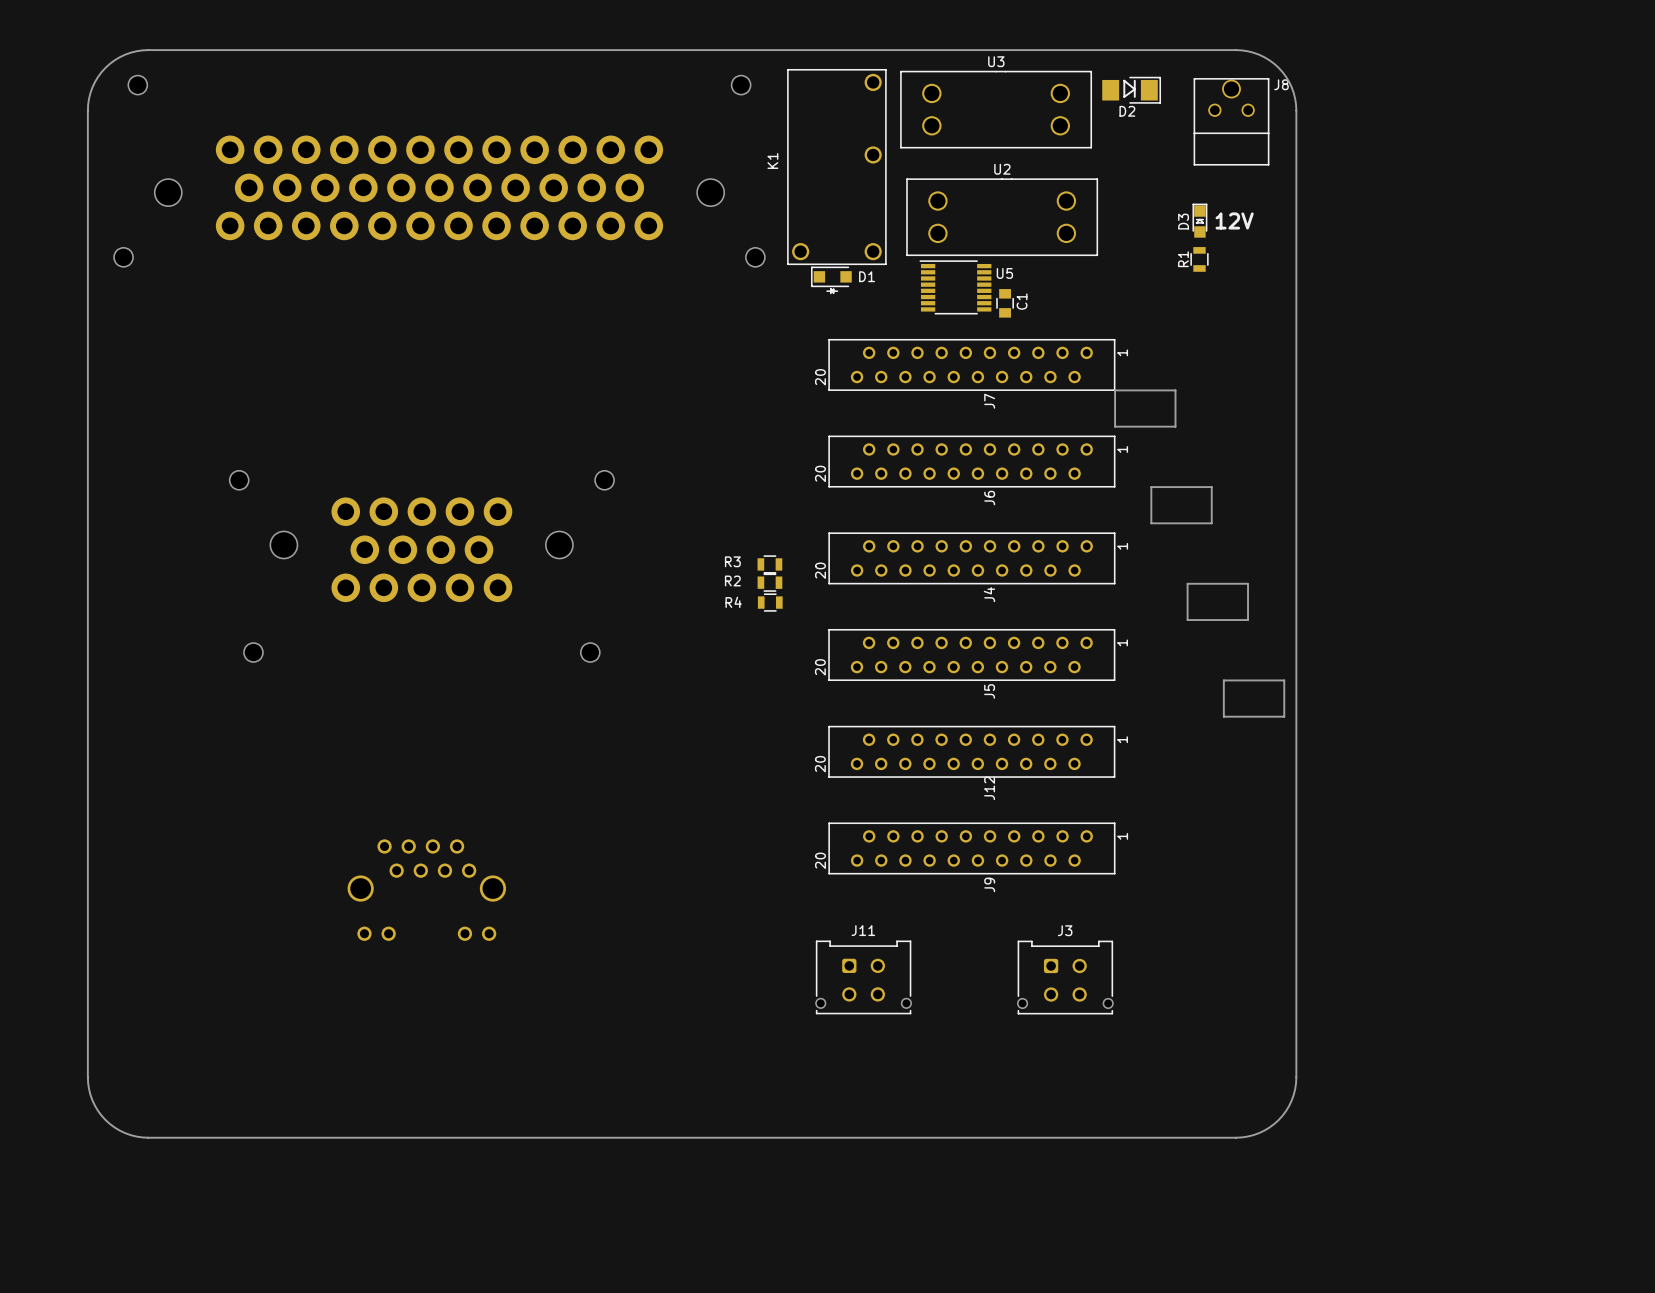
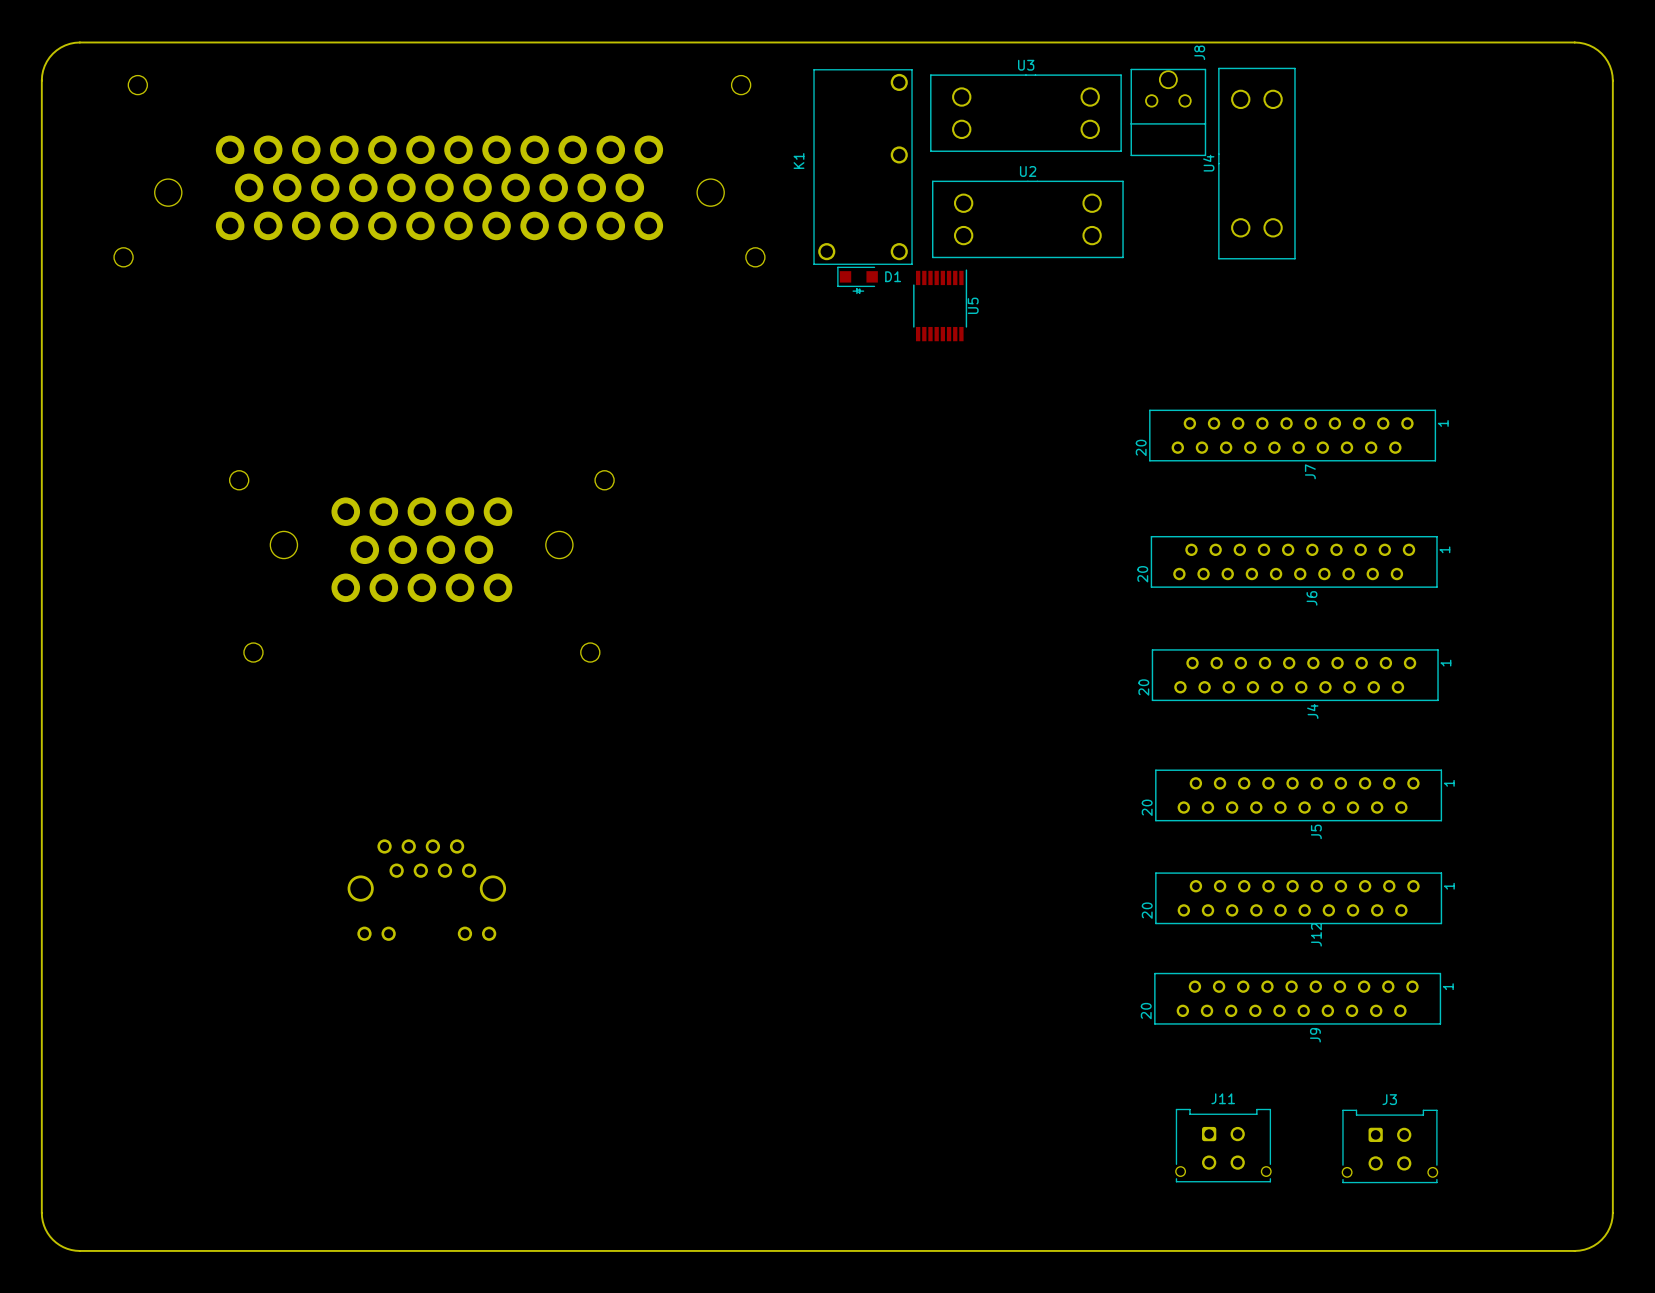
board edge: (148, 50) (1235, 50) (1259, 54) (1278, 67) (1291, 87) (1296, 110) (1296, 1077) (1291, 1100) (1278, 1120) (1259, 1133) (1235, 1137) (148, 1137) (125, 1133) (105, 1120) (92, 1100) (87, 1077) (87, 110) (92, 87) (105, 67) (125, 54) (148, 50) -> (79, 42) (65, 45) (52, 53) (44, 65) (41, 80) (41, 1212) (45, 1229) (56, 1242) (67, 1248) (79, 1250) (1574, 1250) (1593, 1245) (1604, 1236) (1609, 1227) (1612, 1212) (1612, 80) (1607, 61) (1597, 50) (1589, 45) (1574, 42) (79, 42)
J8 name rotation: 0° (1281, 84) -> 90° counterclockwise (1199, 52)
J8 name position: J8 (1281, 84) -> J8 (1199, 52)
D2: (1131, 90) -> none
U3 position: (996, 109) -> (1025, 113)
J8 position: (1231, 121) -> (1168, 112)
U4: none -> (1256, 163)
K1 position: (836, 167) -> (863, 167)
U2 position: (1002, 217) -> (1027, 219)
D3: (1199, 220) -> none
text: 12V (1234, 220) -> none
R1: (1199, 259) -> none
U5 name position: U5 (1004, 273) -> U5 (973, 305)
D1 position: (831, 280) -> (857, 280)
U5 rotation: 0° (955, 287) -> 90° clockwise (940, 305)
C1: (1005, 303) -> none
J7 position: (971, 364) -> (1292, 435)
board edge: (1115, 390) (1175, 390) (1175, 426) (1115, 426) (1115, 390) -> none
J6 position: (971, 461) -> (1294, 561)
board edge: (1151, 487) (1151, 523) (1211, 523) (1211, 487) (1151, 487) -> none
J4 position: (971, 558) -> (1295, 675)
R2: (769, 564) -> none
R3: (769, 582) -> none
board edge: (1187, 583) (1187, 620) (1248, 620) (1248, 583) (1187, 583) -> none
R4: (770, 602) -> none
J5 position: (971, 654) -> (1298, 795)
board edge: (1223, 680) (1223, 716) (1284, 716) (1284, 680) (1223, 680) -> none
J12 position: (971, 751) -> (1298, 898)
J9 position: (971, 848) -> (1297, 998)
J11 position: (863, 977) -> (1223, 1145)
J3 position: (1065, 977) -> (1389, 1146)

